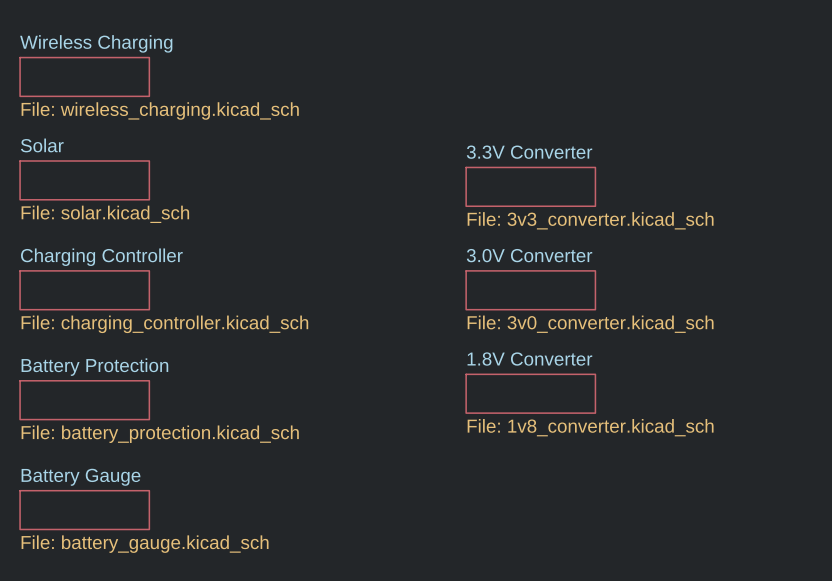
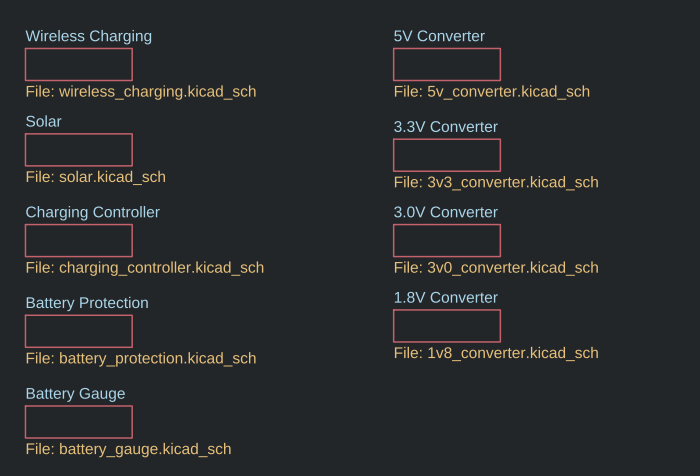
sheet 5V Converter: none -> File: 5v_converter.kicad_sch (447, 64)

